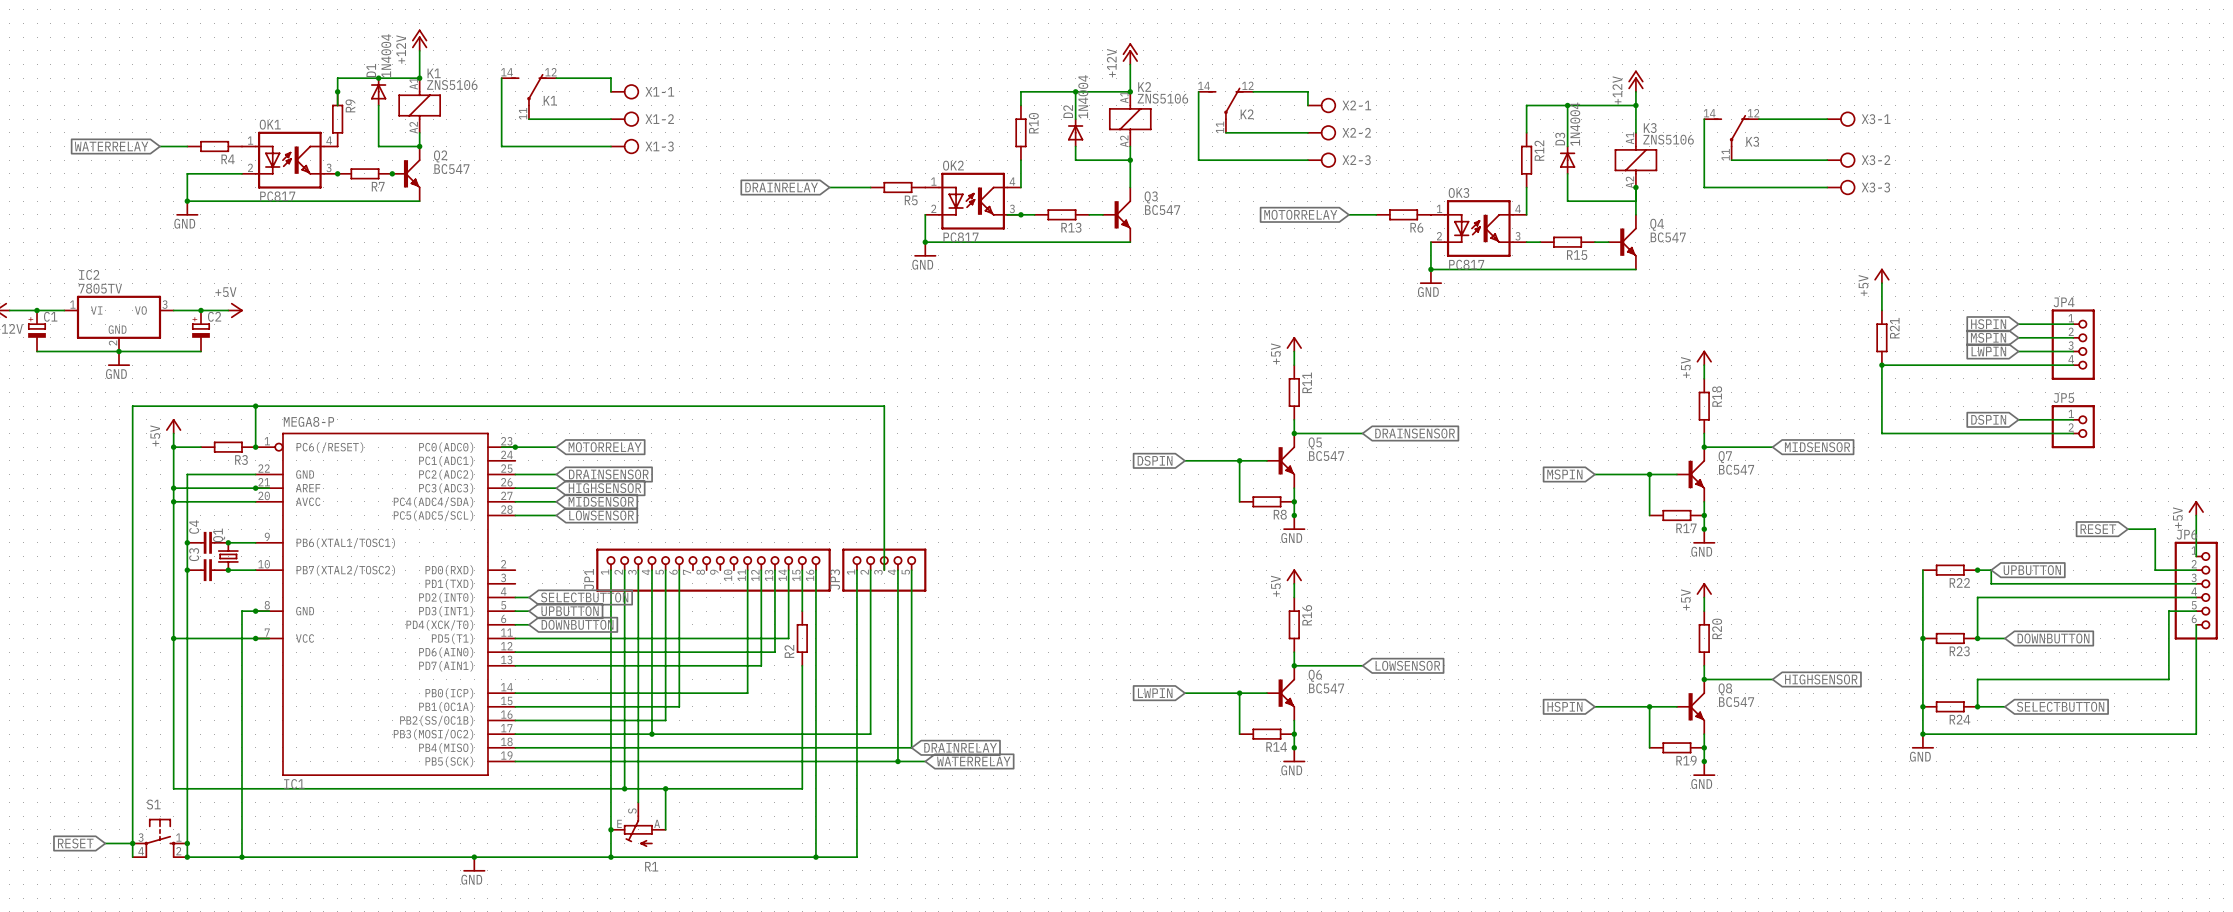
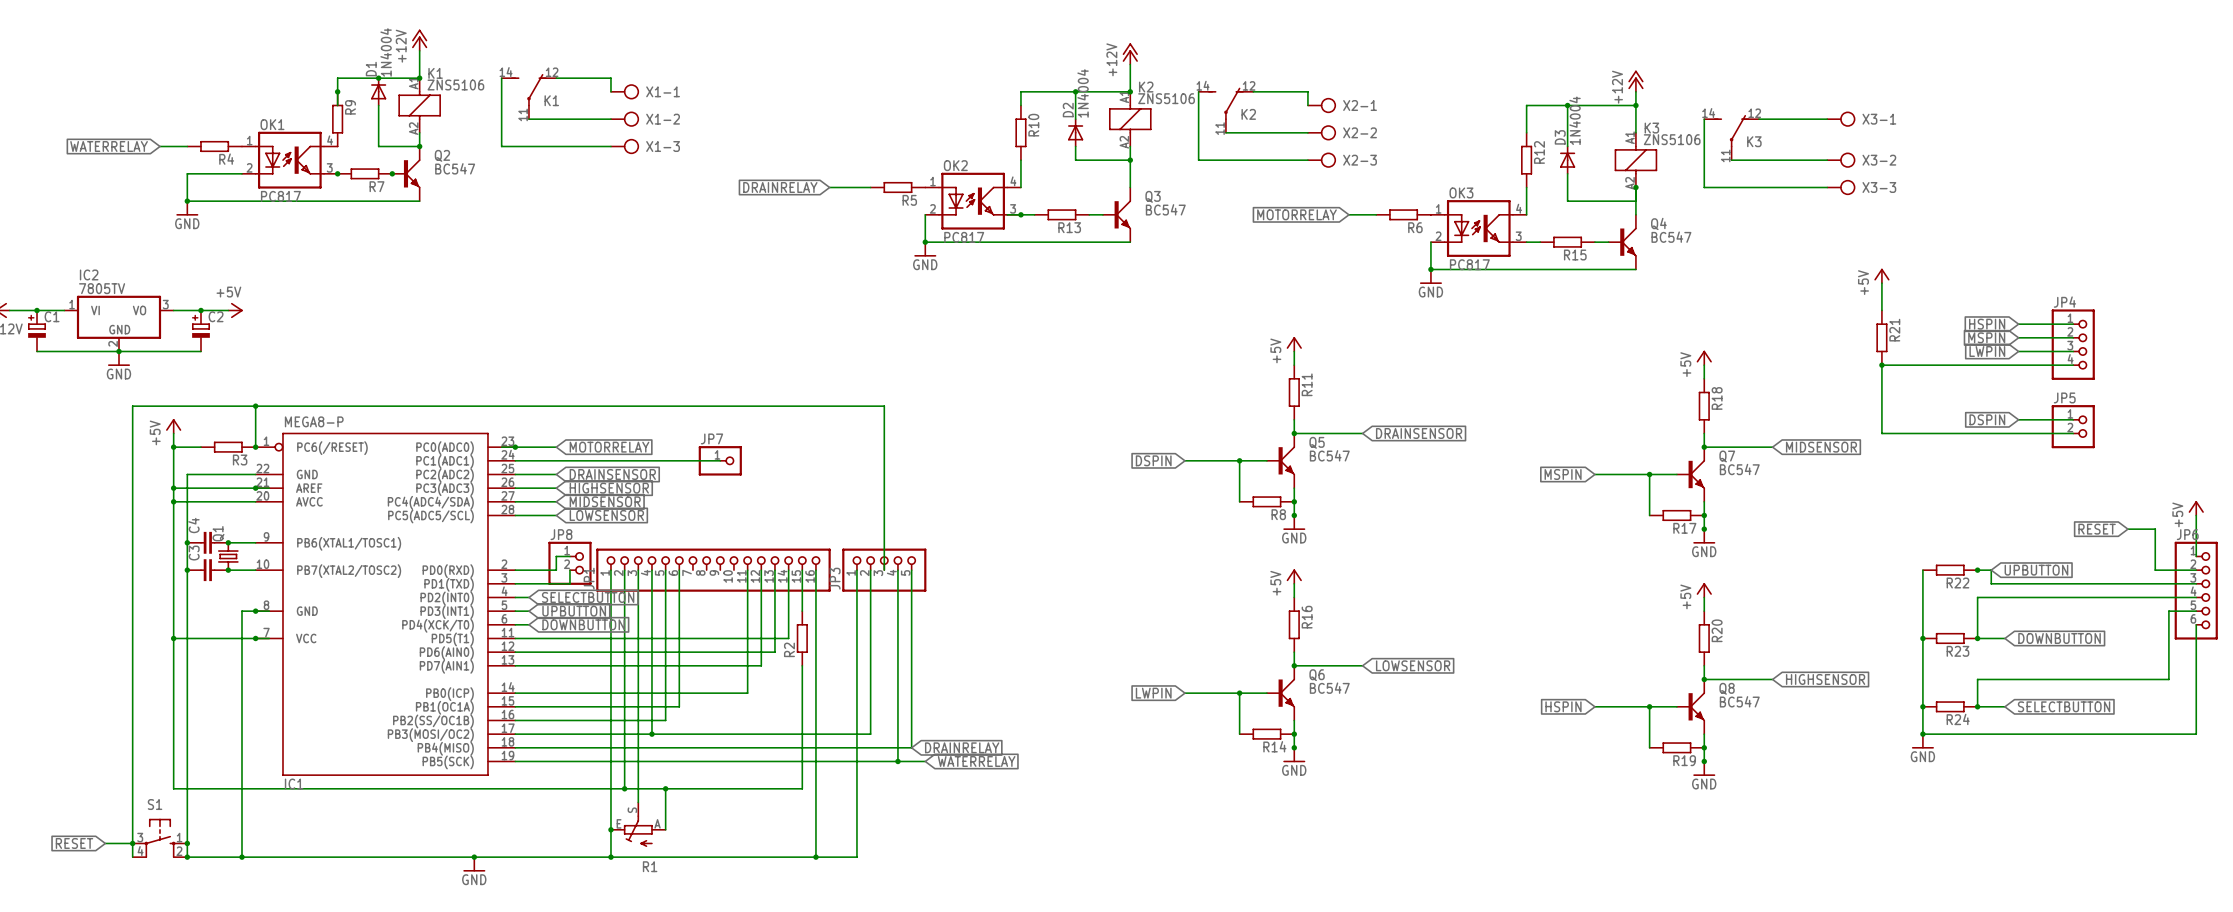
wire: none -> (515, 460) (720, 460)
JP7: none -> (720, 460)
wire: none -> (569, 556) (556, 556) (556, 570) (515, 570)
JP8: none -> (569, 563)
wire: none -> (569, 570) (569, 583) (515, 583)

